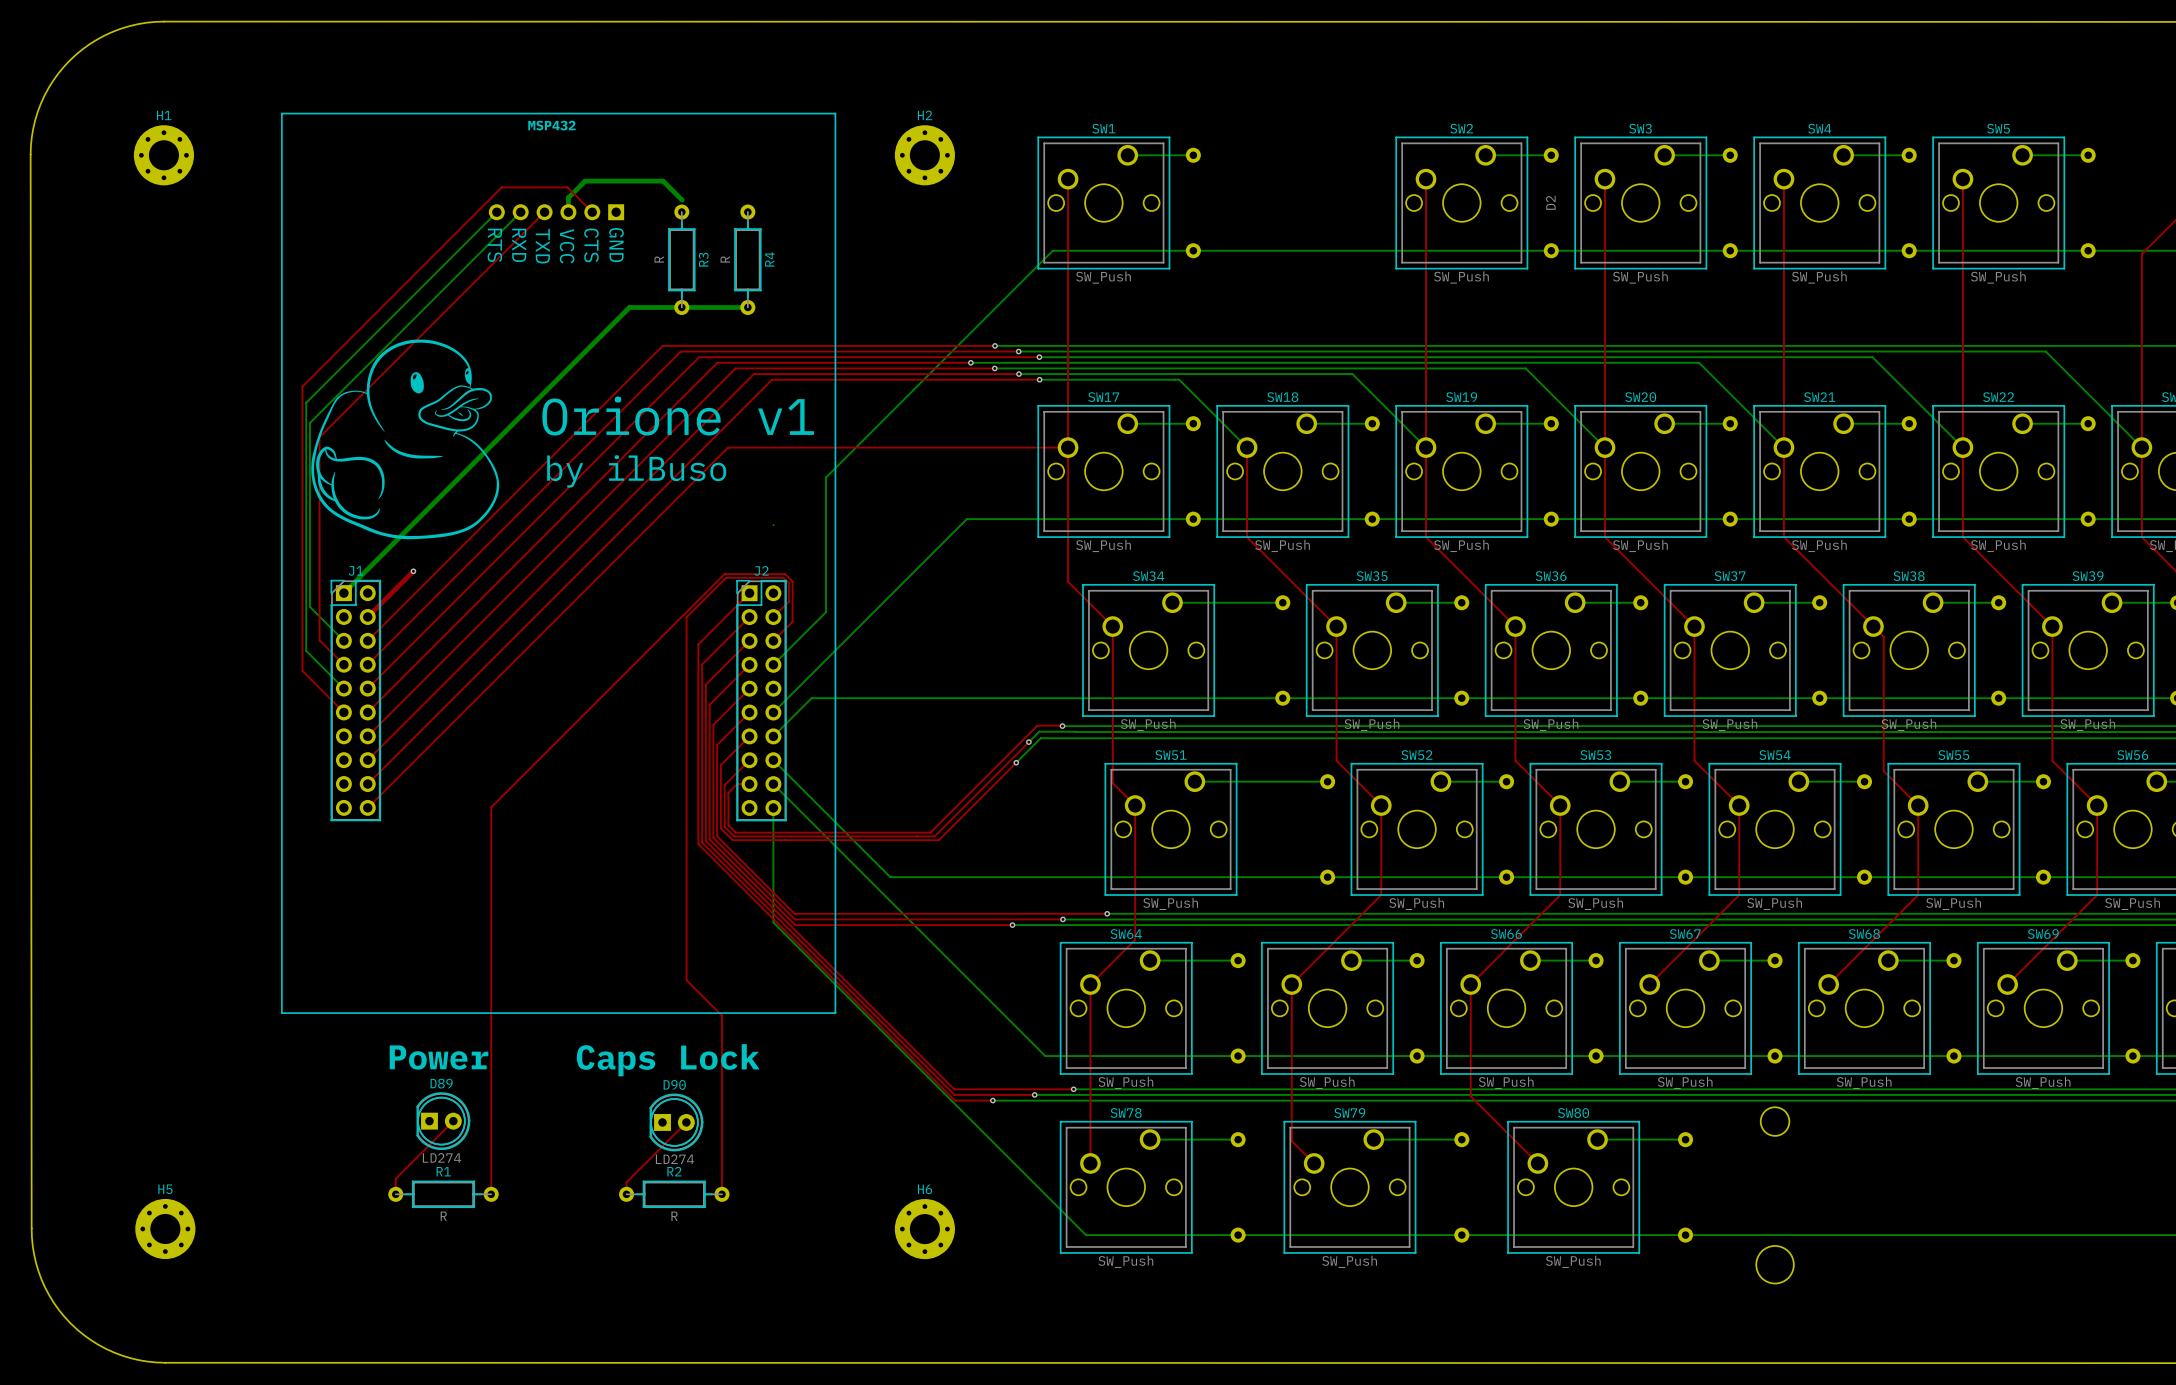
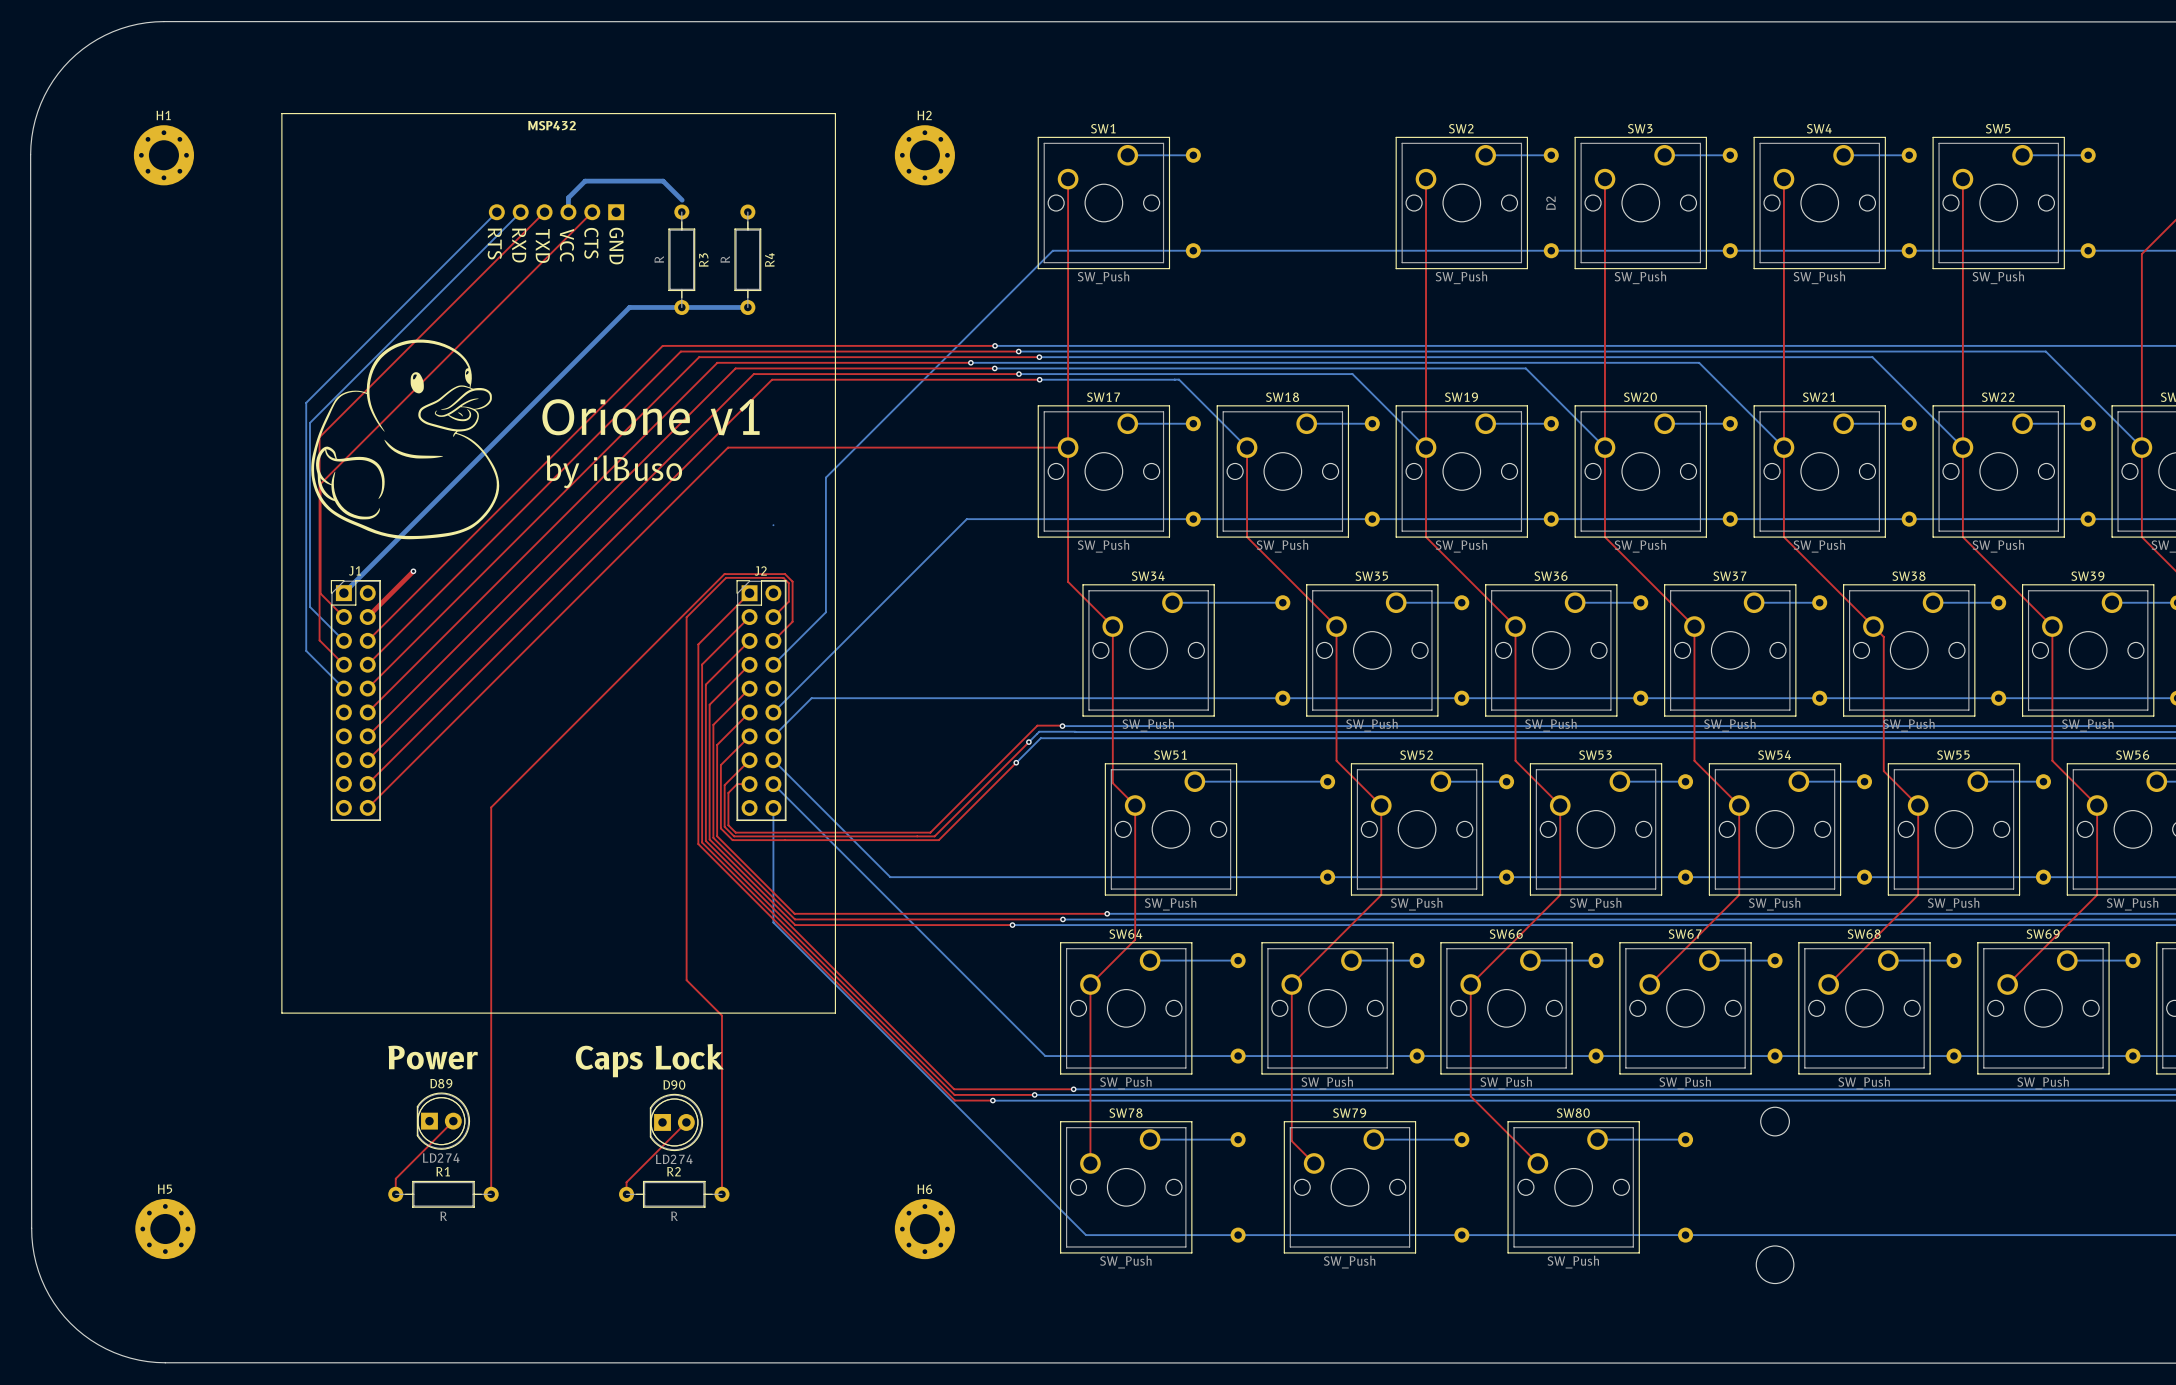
top track: (592, 212) (567, 187) (501, 187) (302, 386) (302, 671) (343, 712) -> (592, 212) (320, 483) (320, 593) (343, 616)

